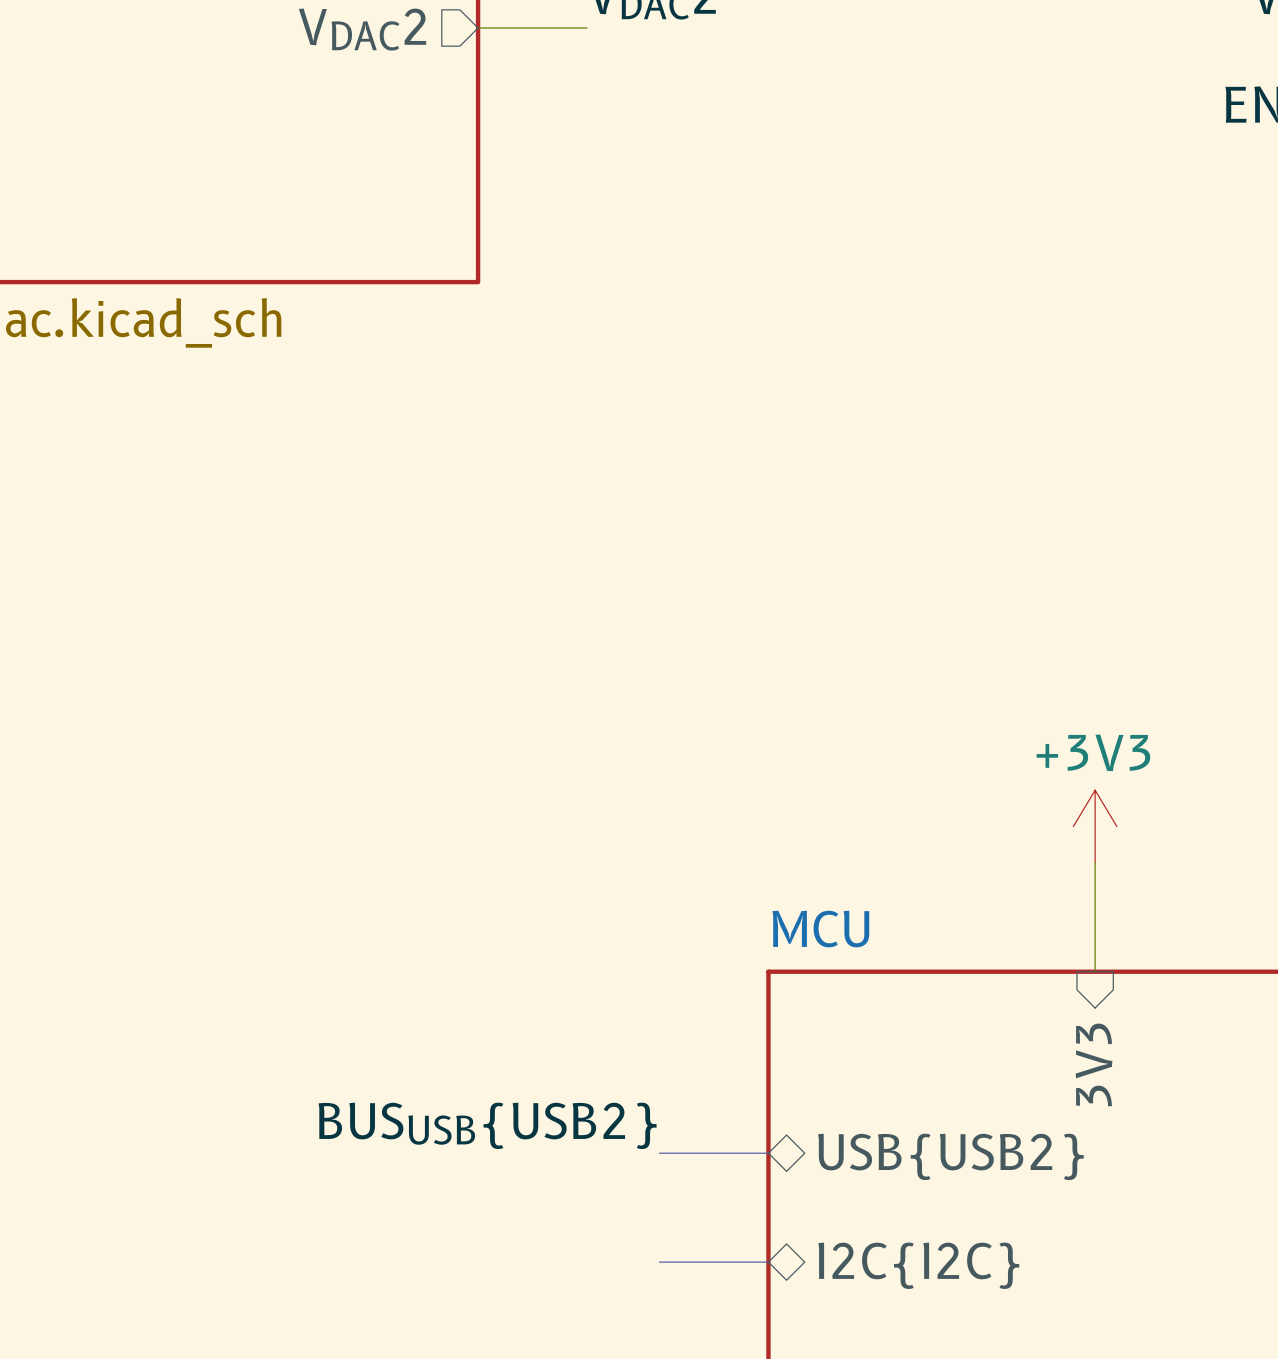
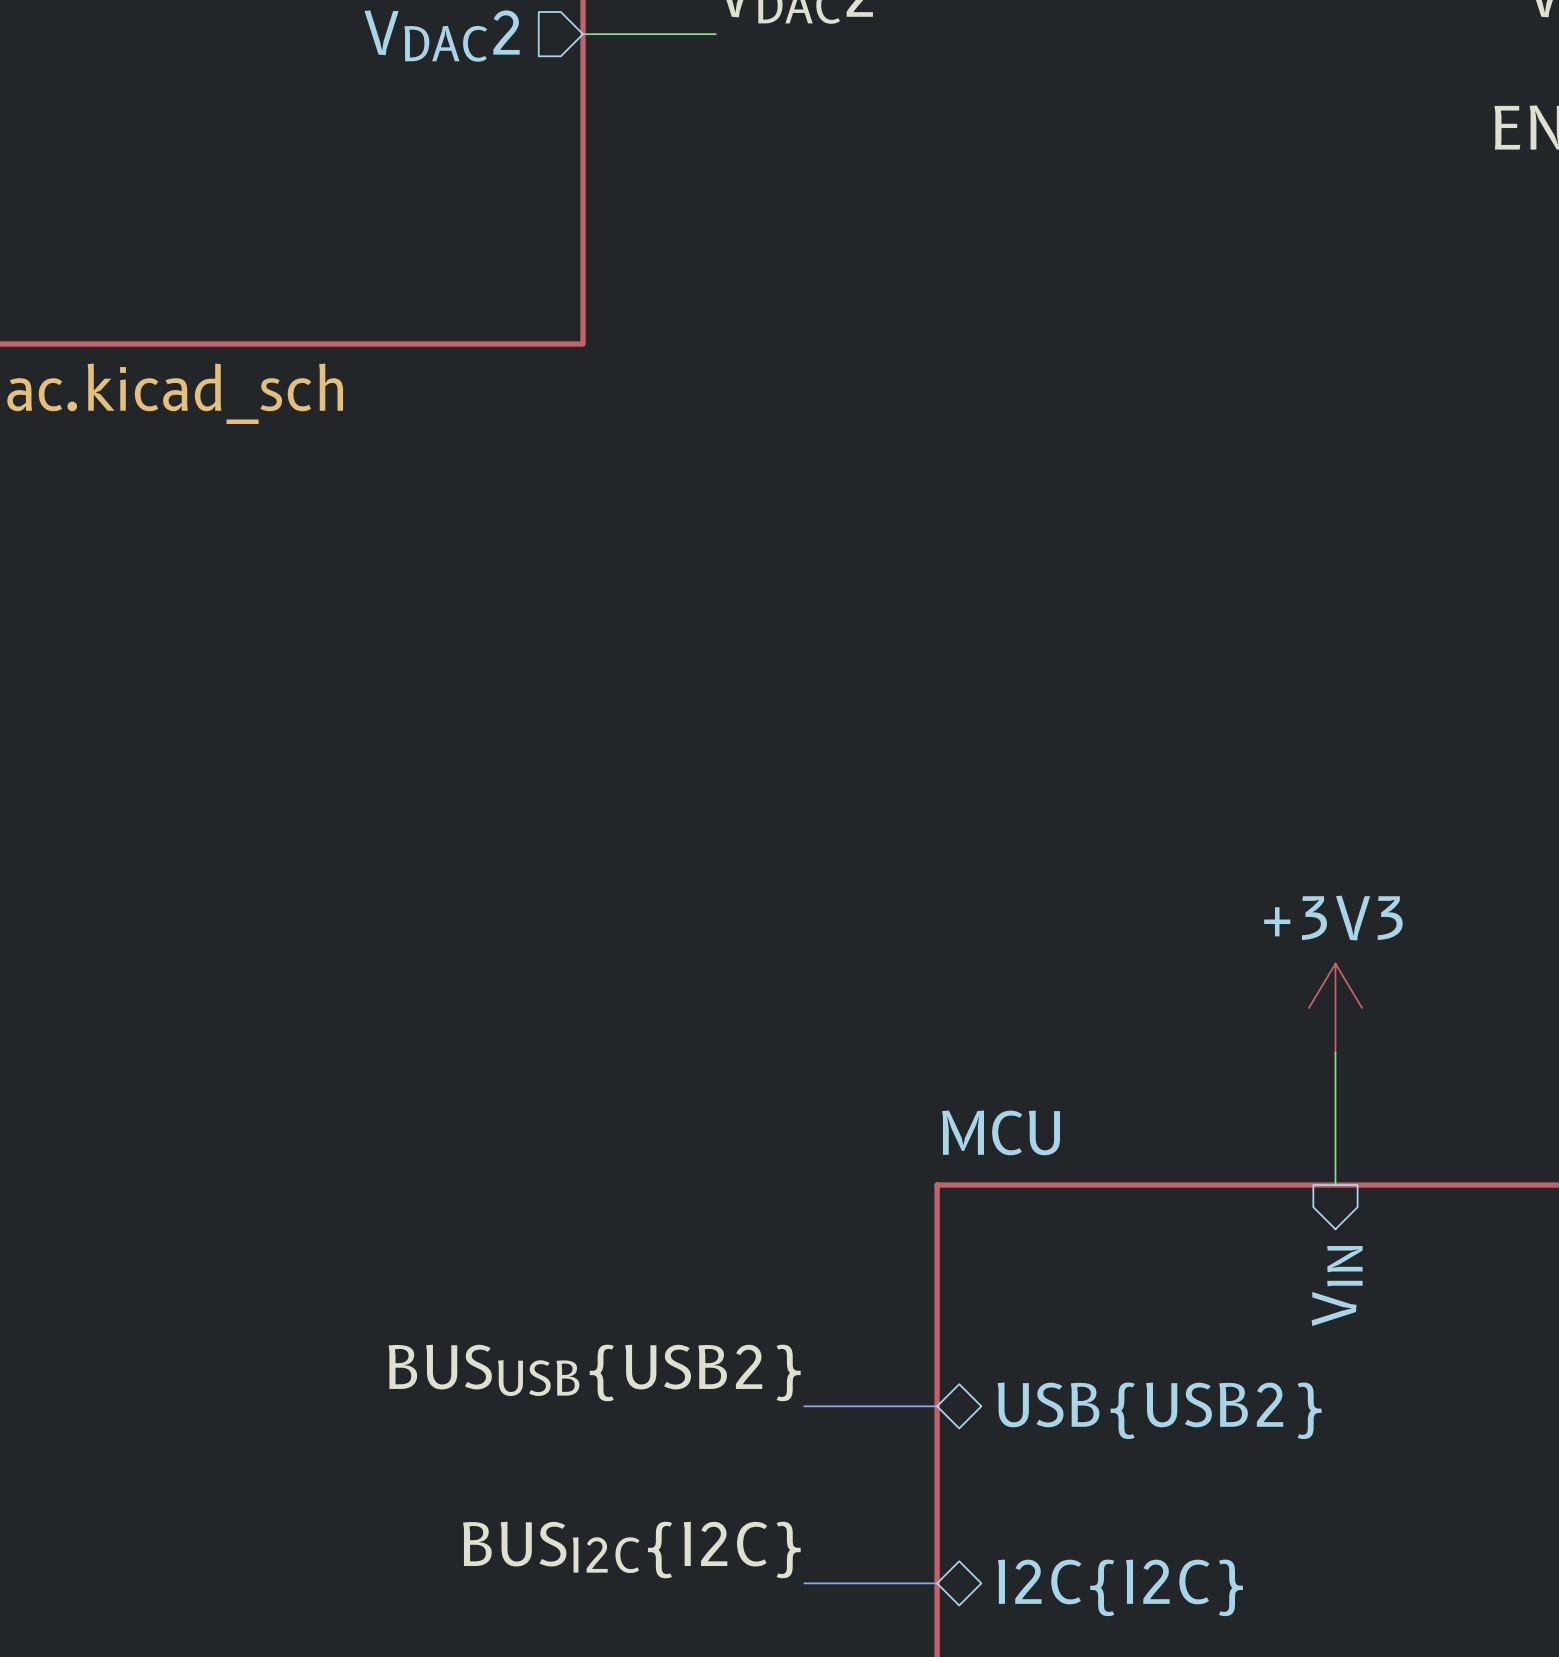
sheet pin: 3V3 (1094, 1064) -> VIN (1337, 1286)
bus: (659, 1262) (768, 1262) -> (804, 1583) (937, 1583)
sheet pin position: I2C{I2C} (918, 1265) -> I2C{I2C} (1120, 1587)
label: none -> BUSI2C{I2C} (631, 1549)

